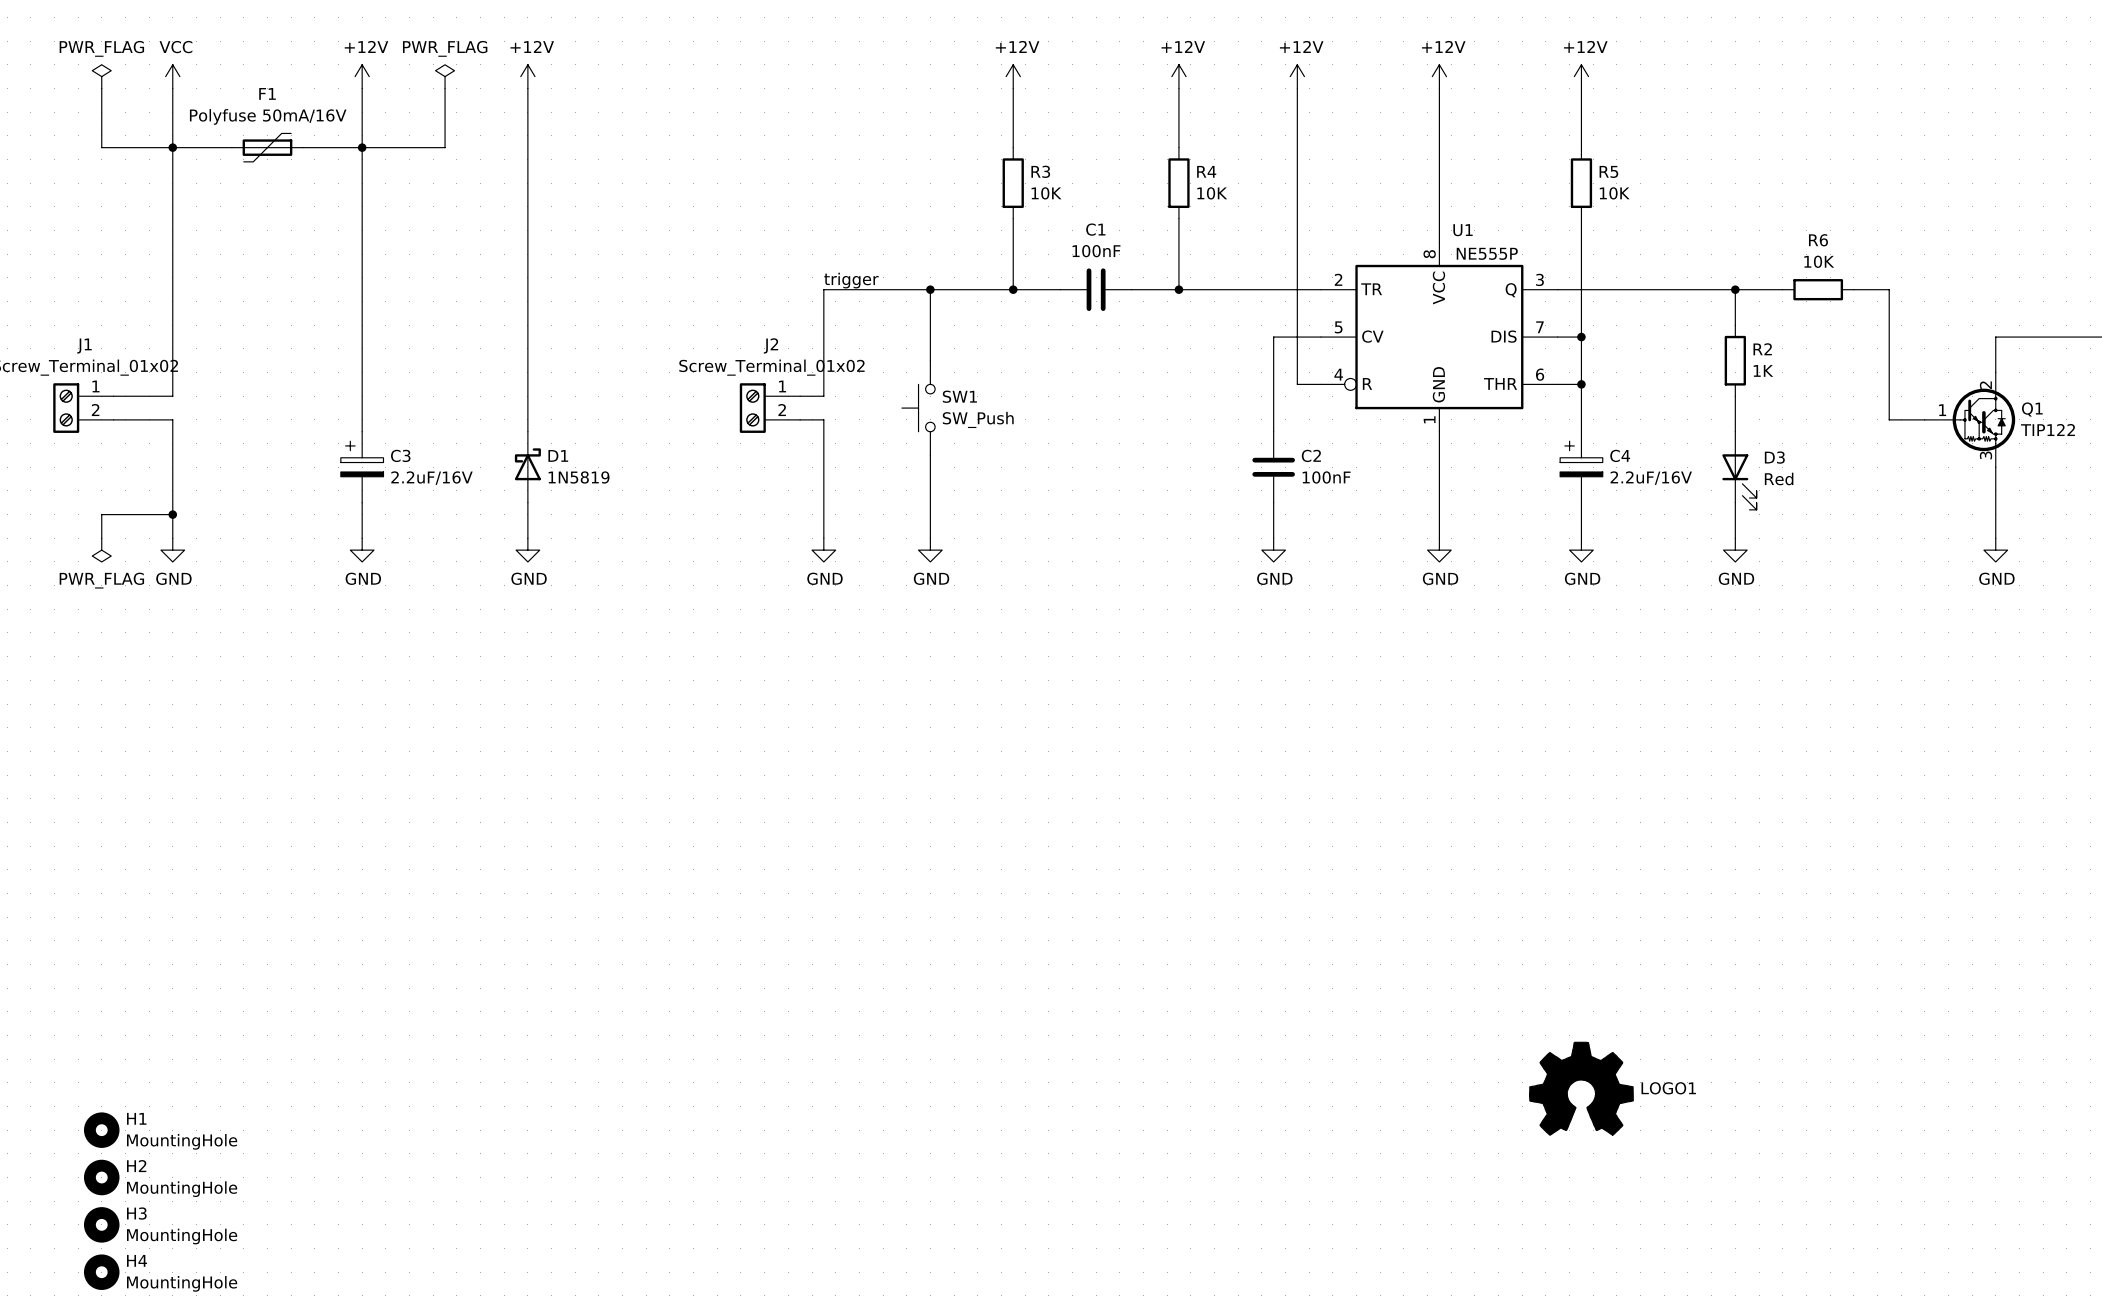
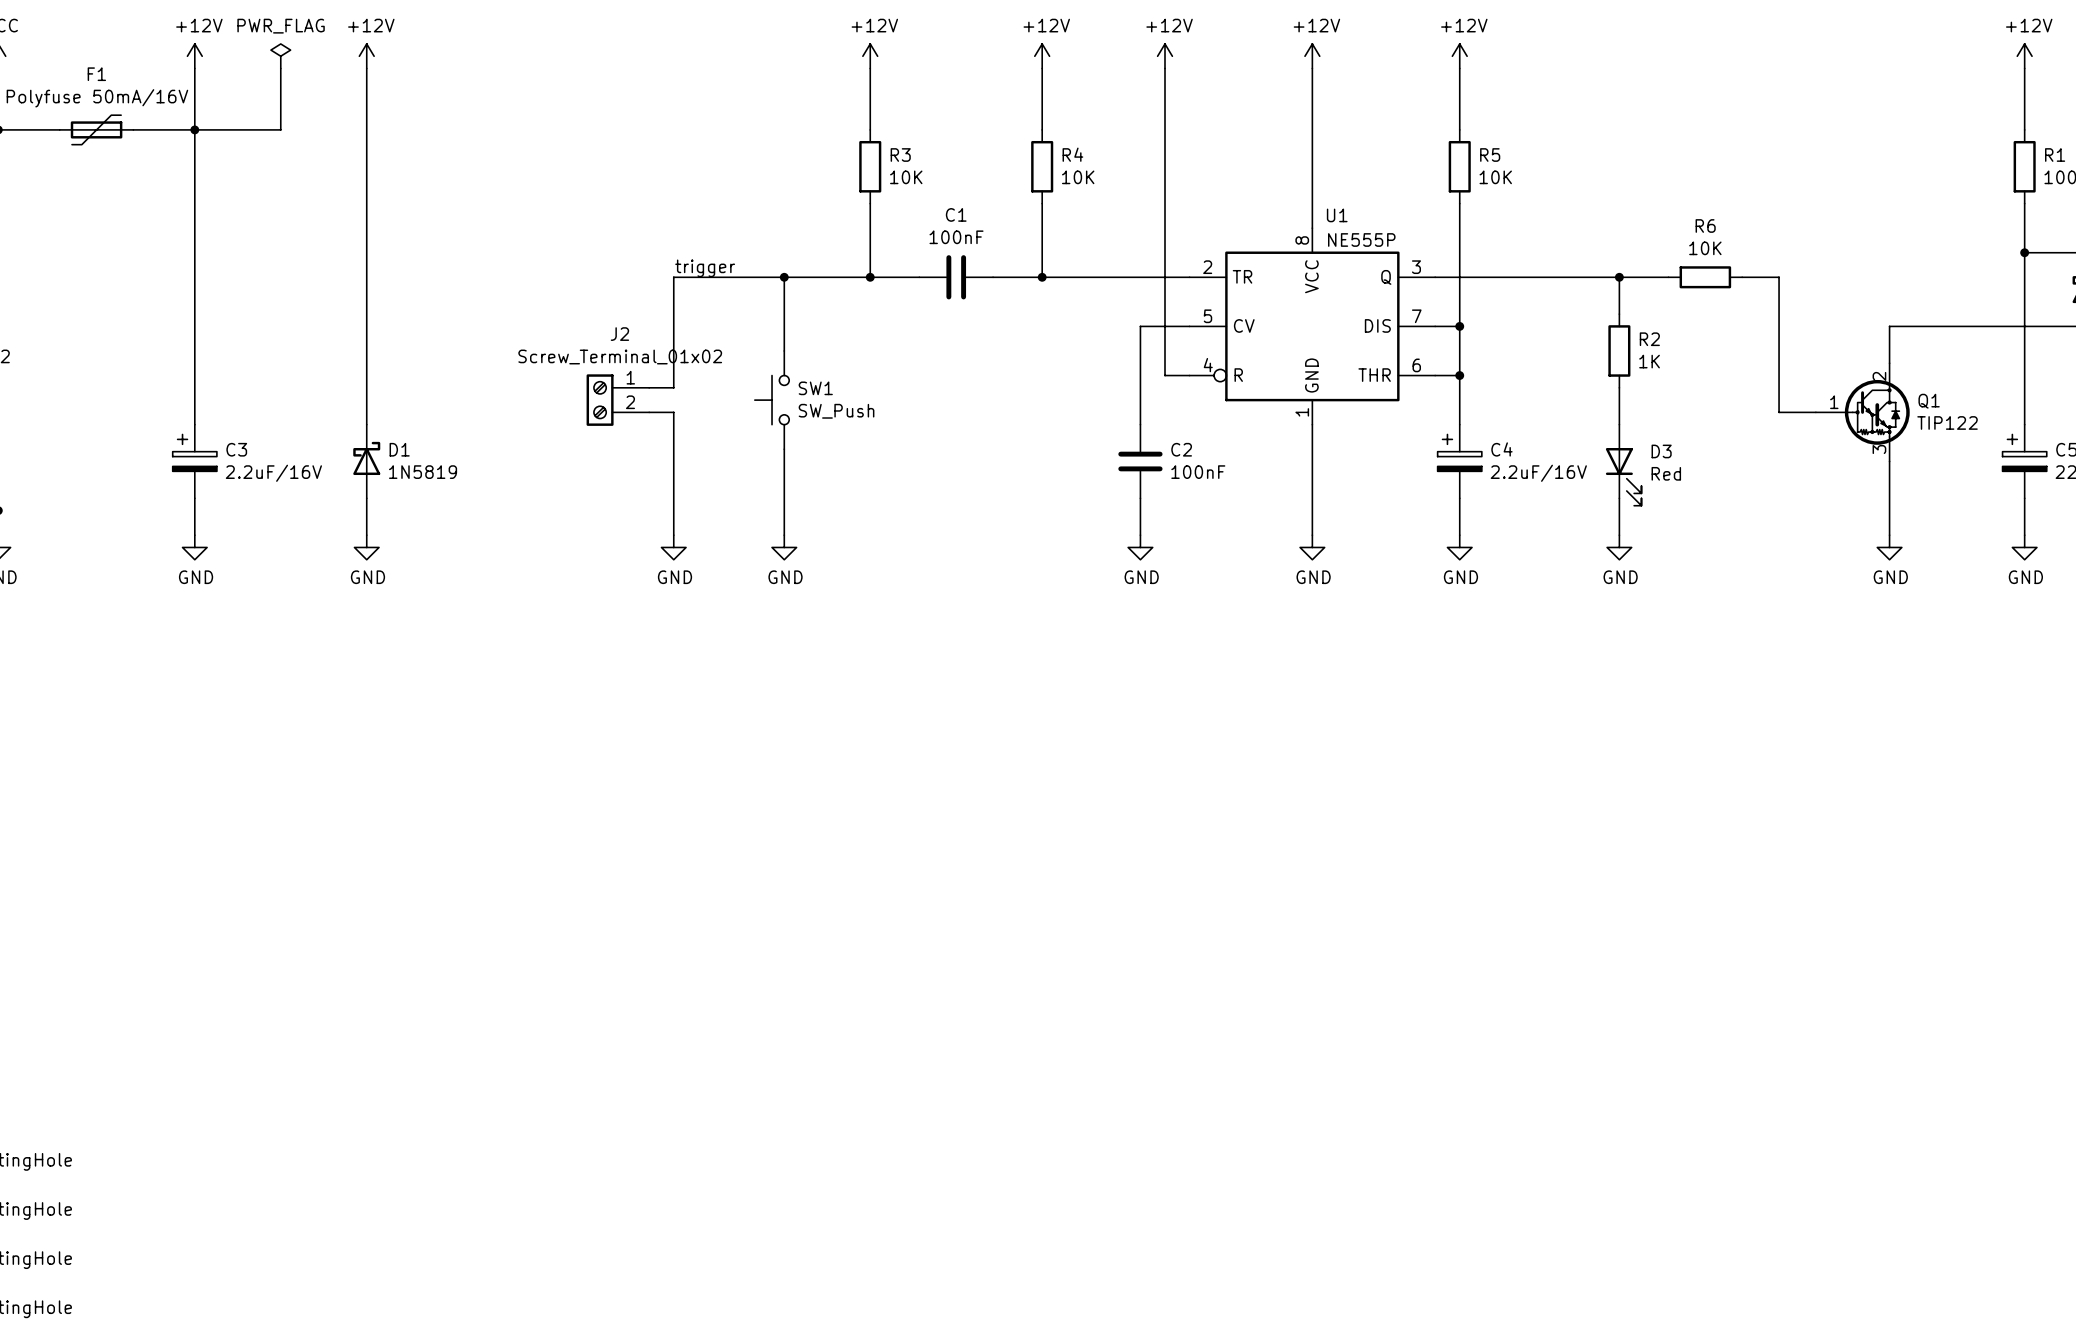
LOGO1: (1581, 1088) -> none

